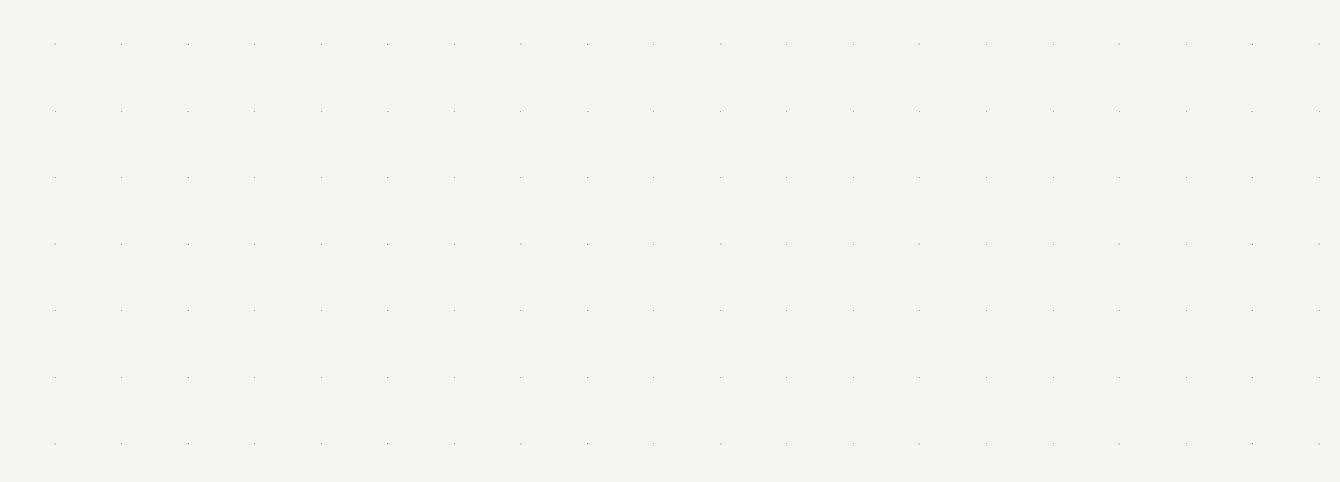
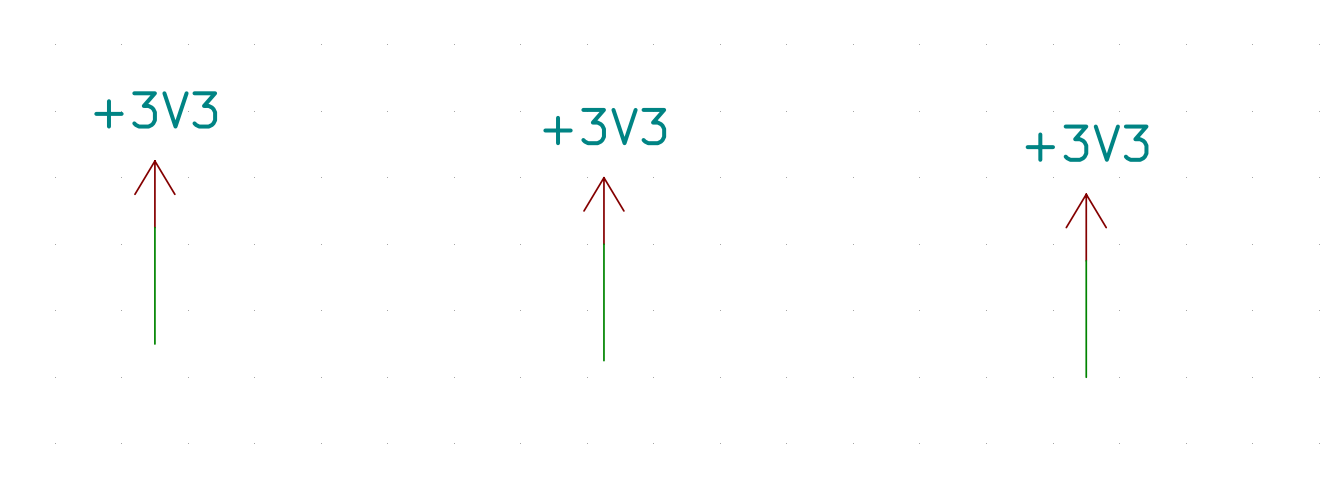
power symbol: none -> +3V3 (154, 194)
power symbol: none -> +3V3 (603, 210)
wire: none -> (154, 227) (154, 344)
power symbol: none -> +3V3 (1086, 227)
wire: none -> (603, 244) (603, 360)
wire: none -> (1086, 260) (1086, 377)

